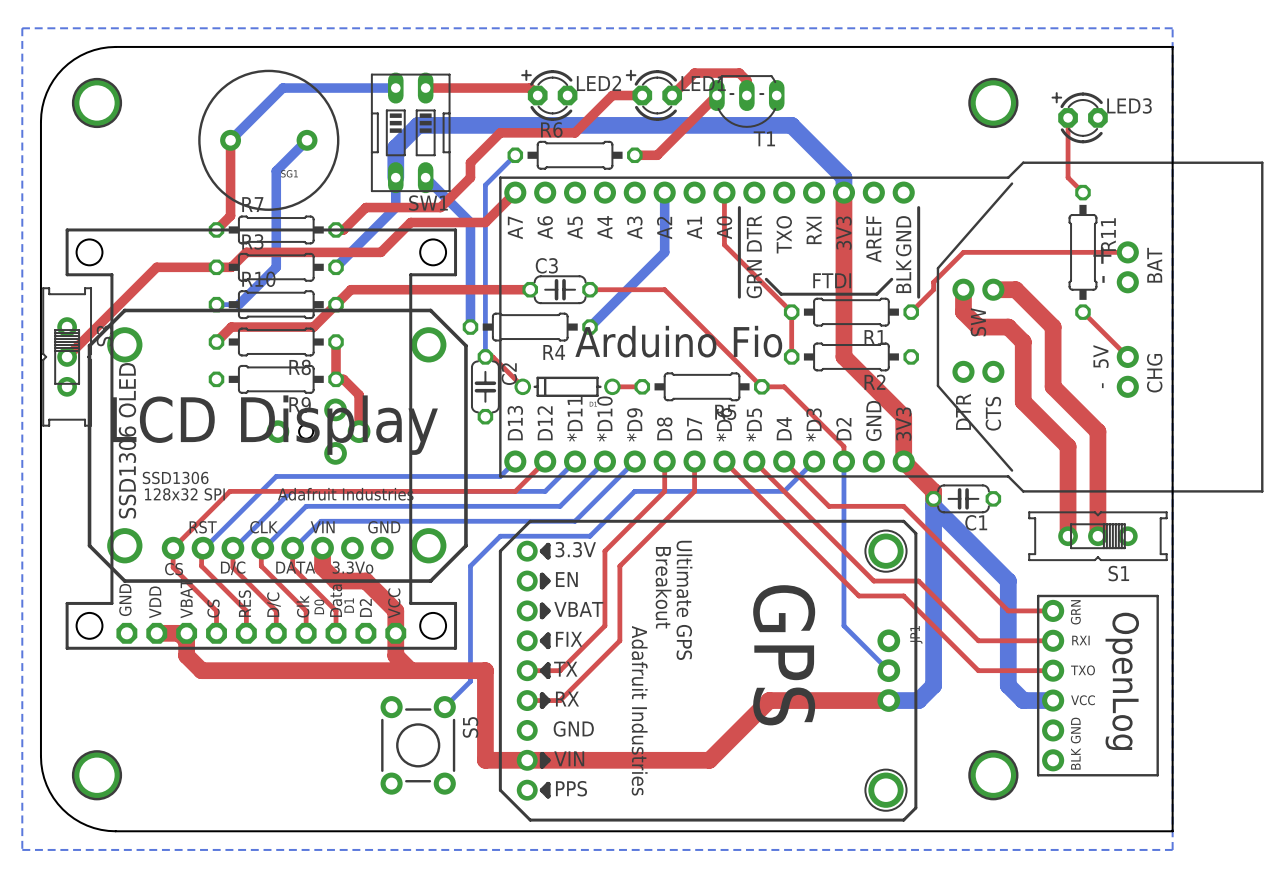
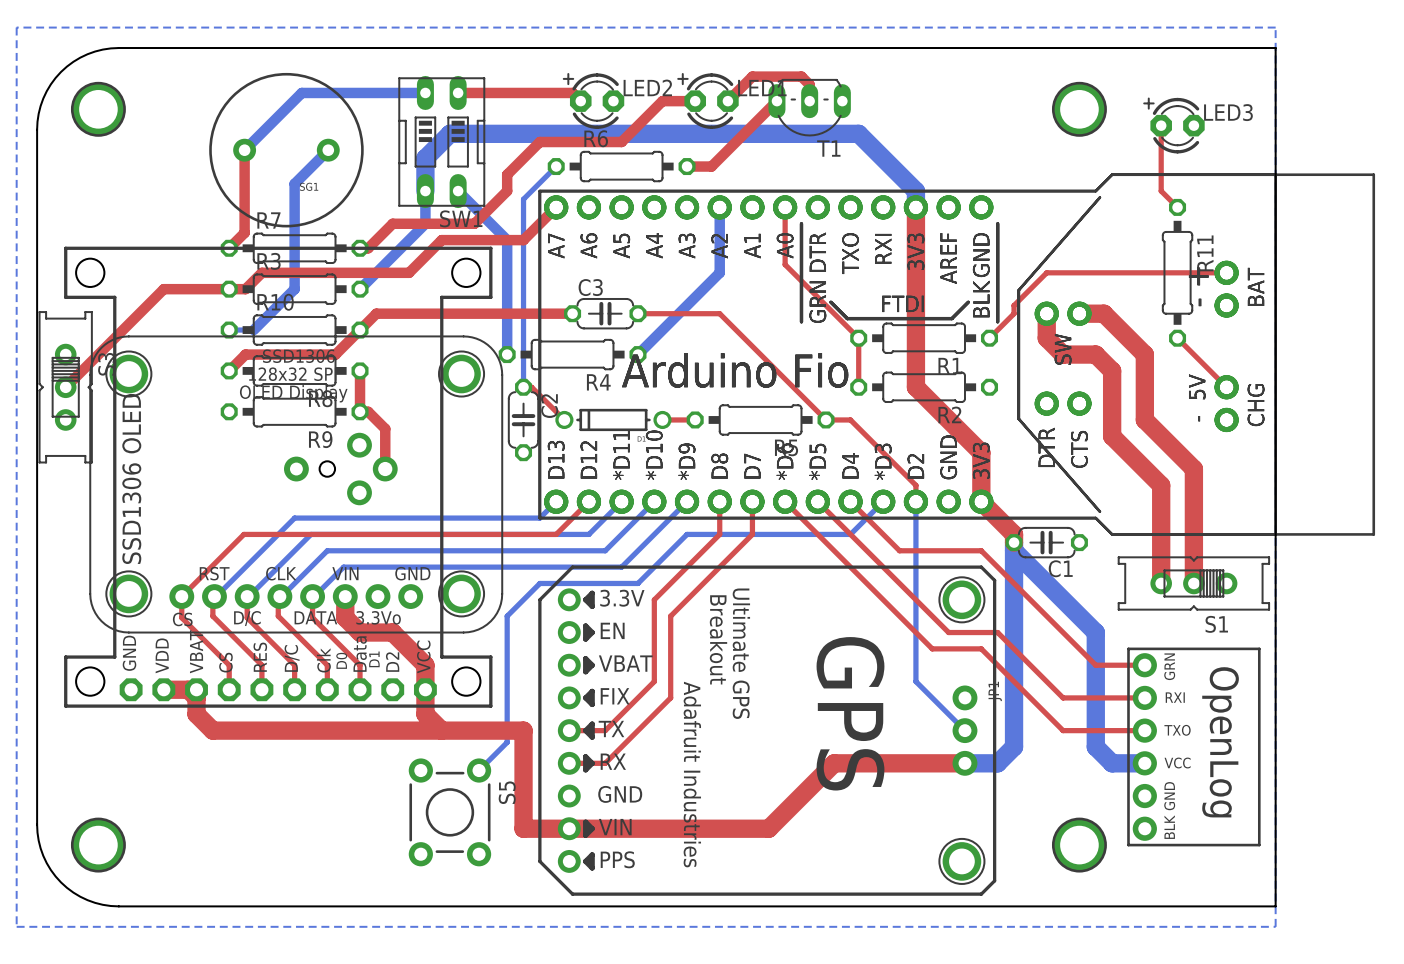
part footprint: [87, 308, 468, 583] -> [89, 335, 503, 634]
part: none -> (907, 354)

